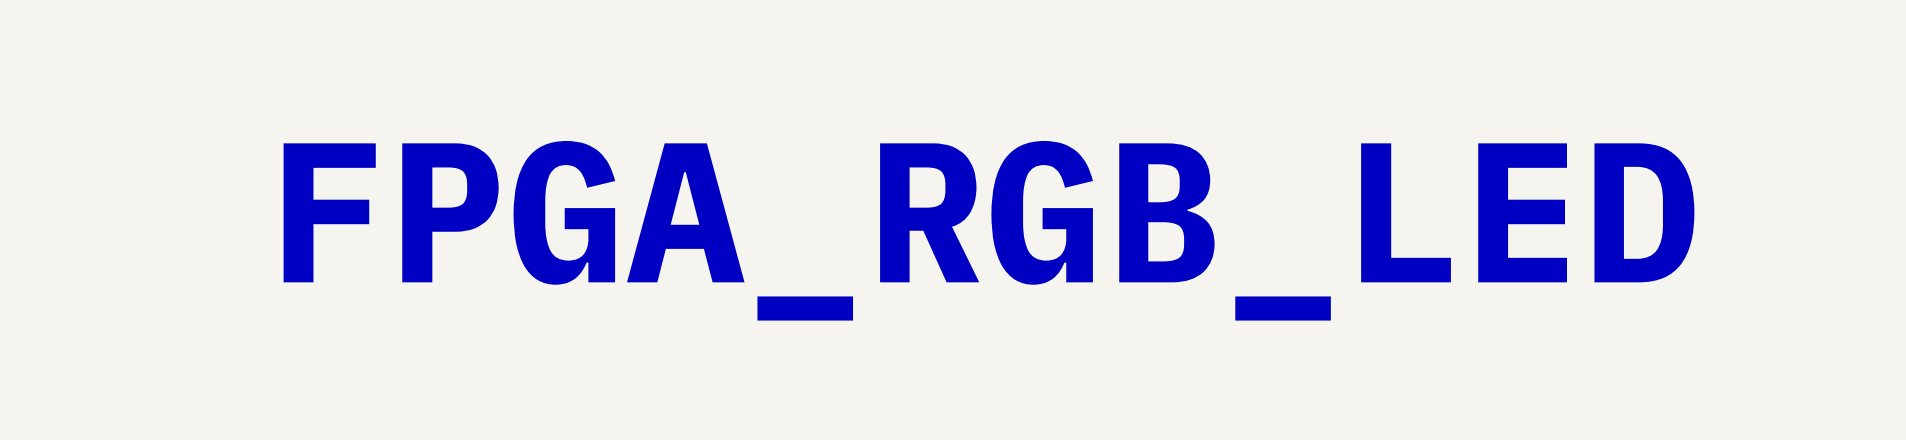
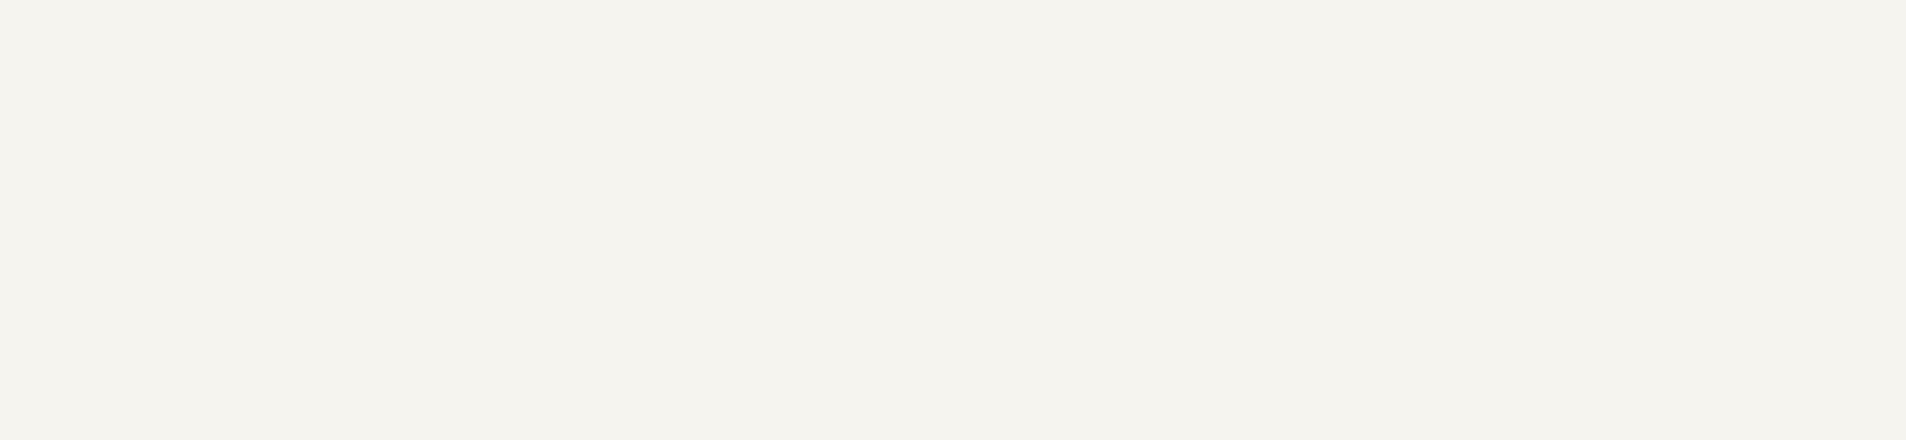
text: FPGA_RGB_LED (989, 230) -> none

